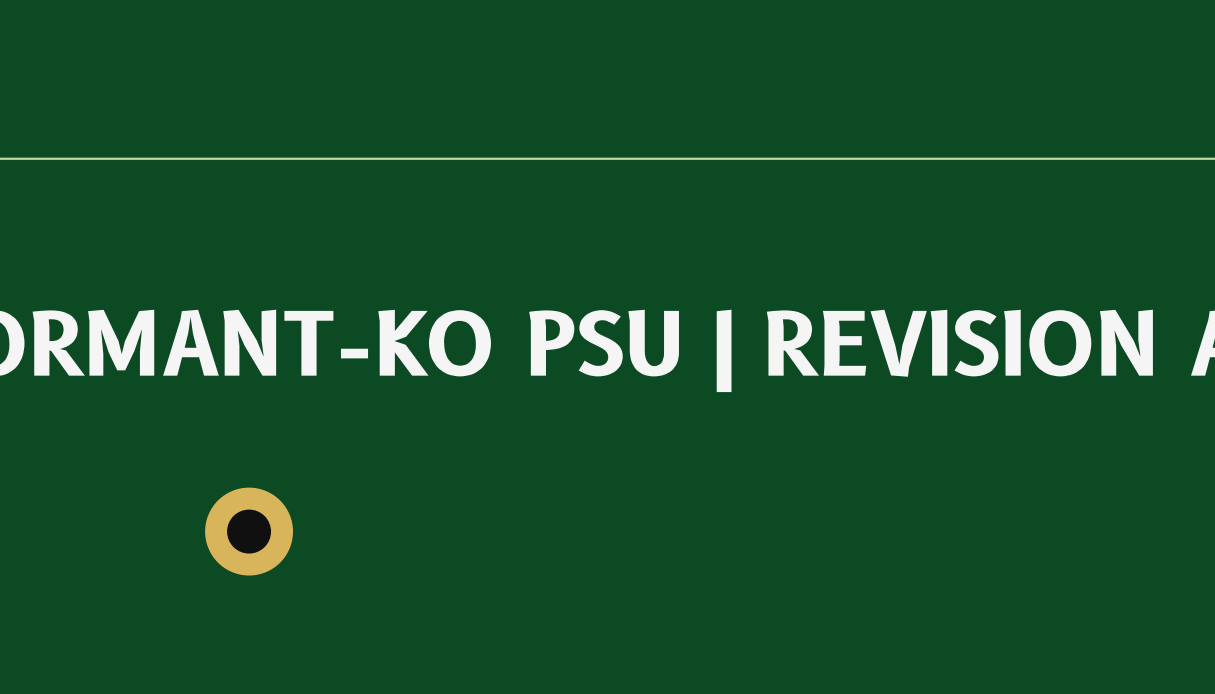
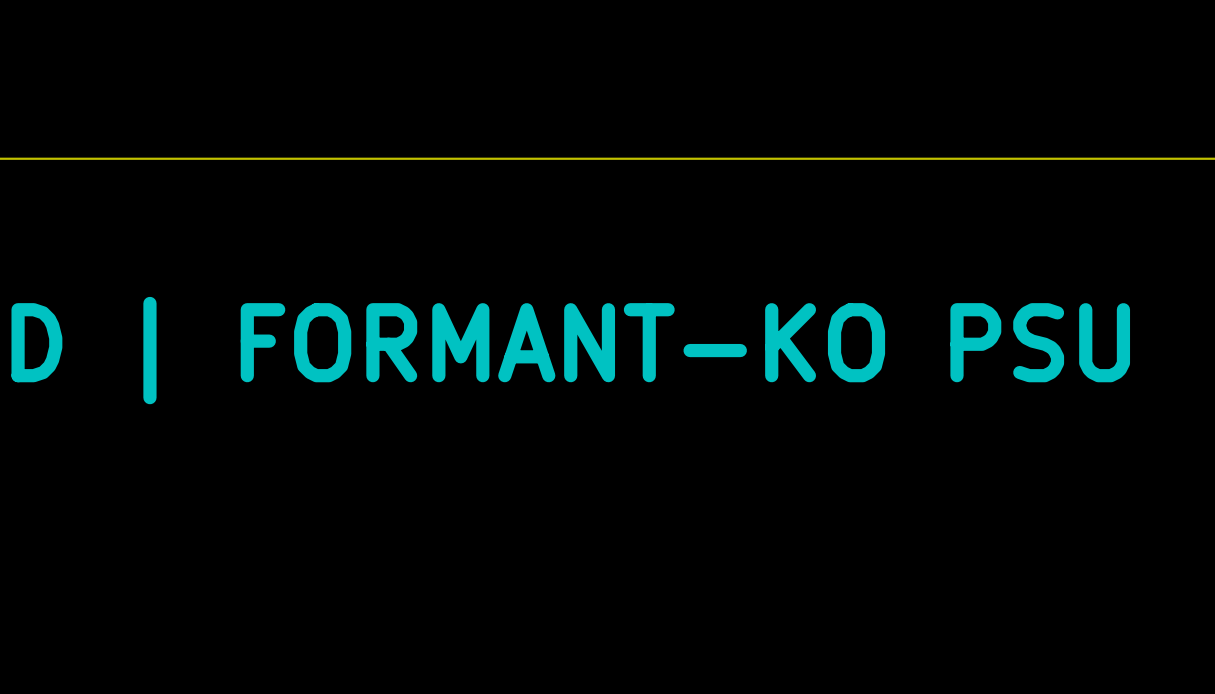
part: (249, 531) -> none

